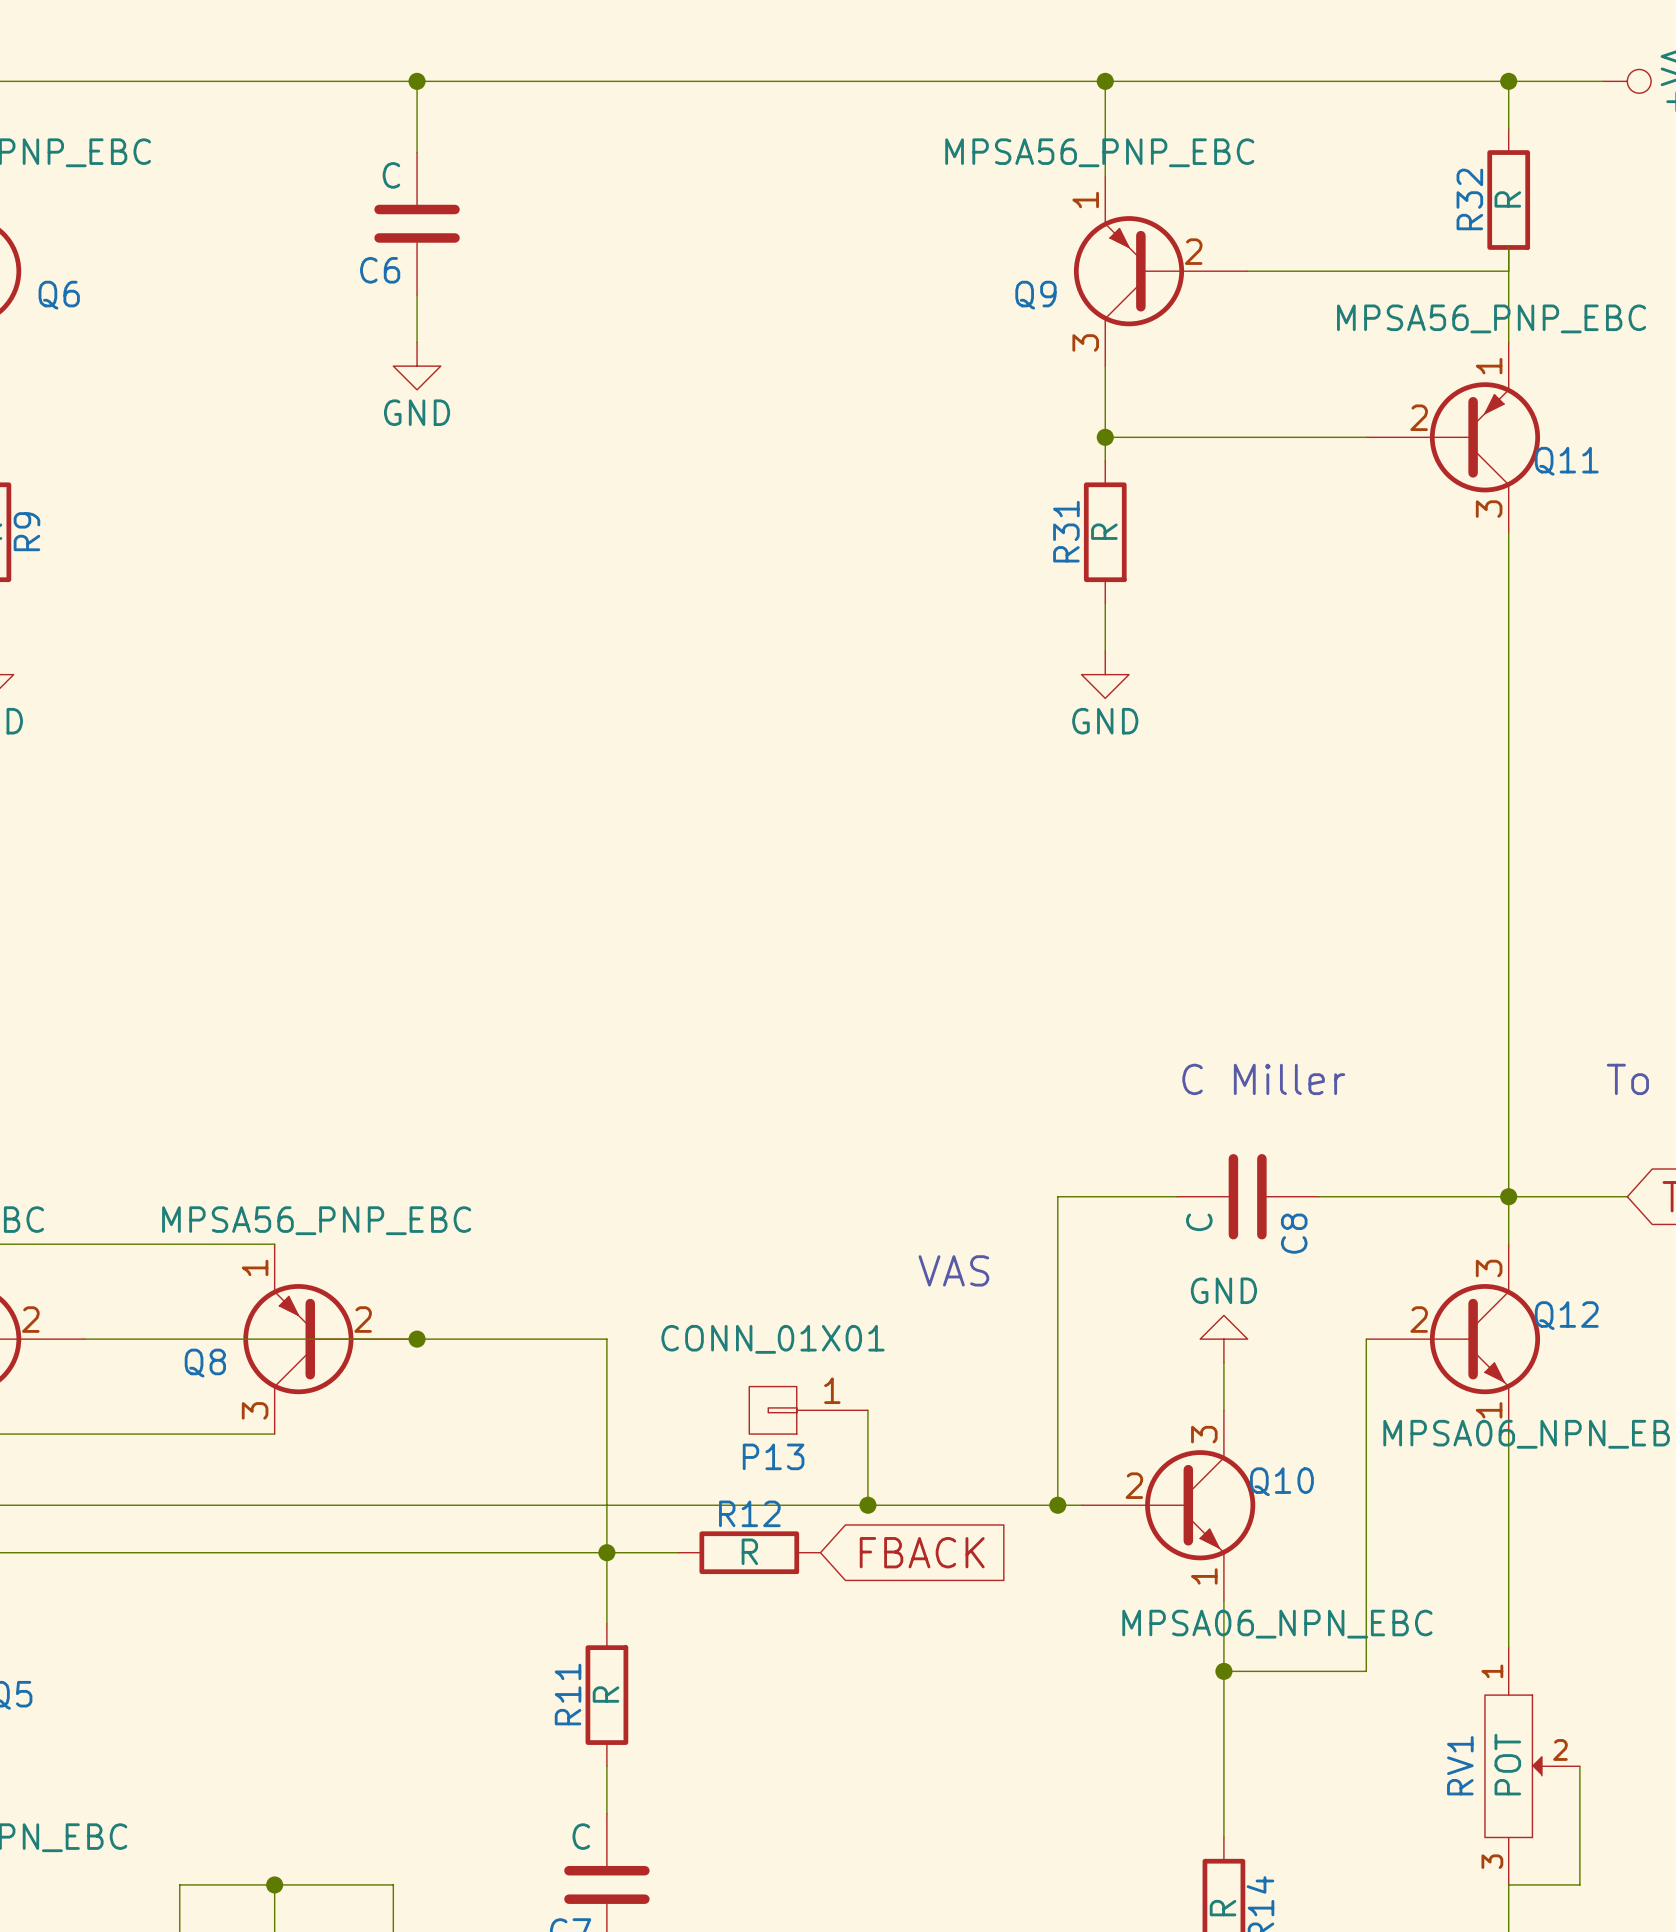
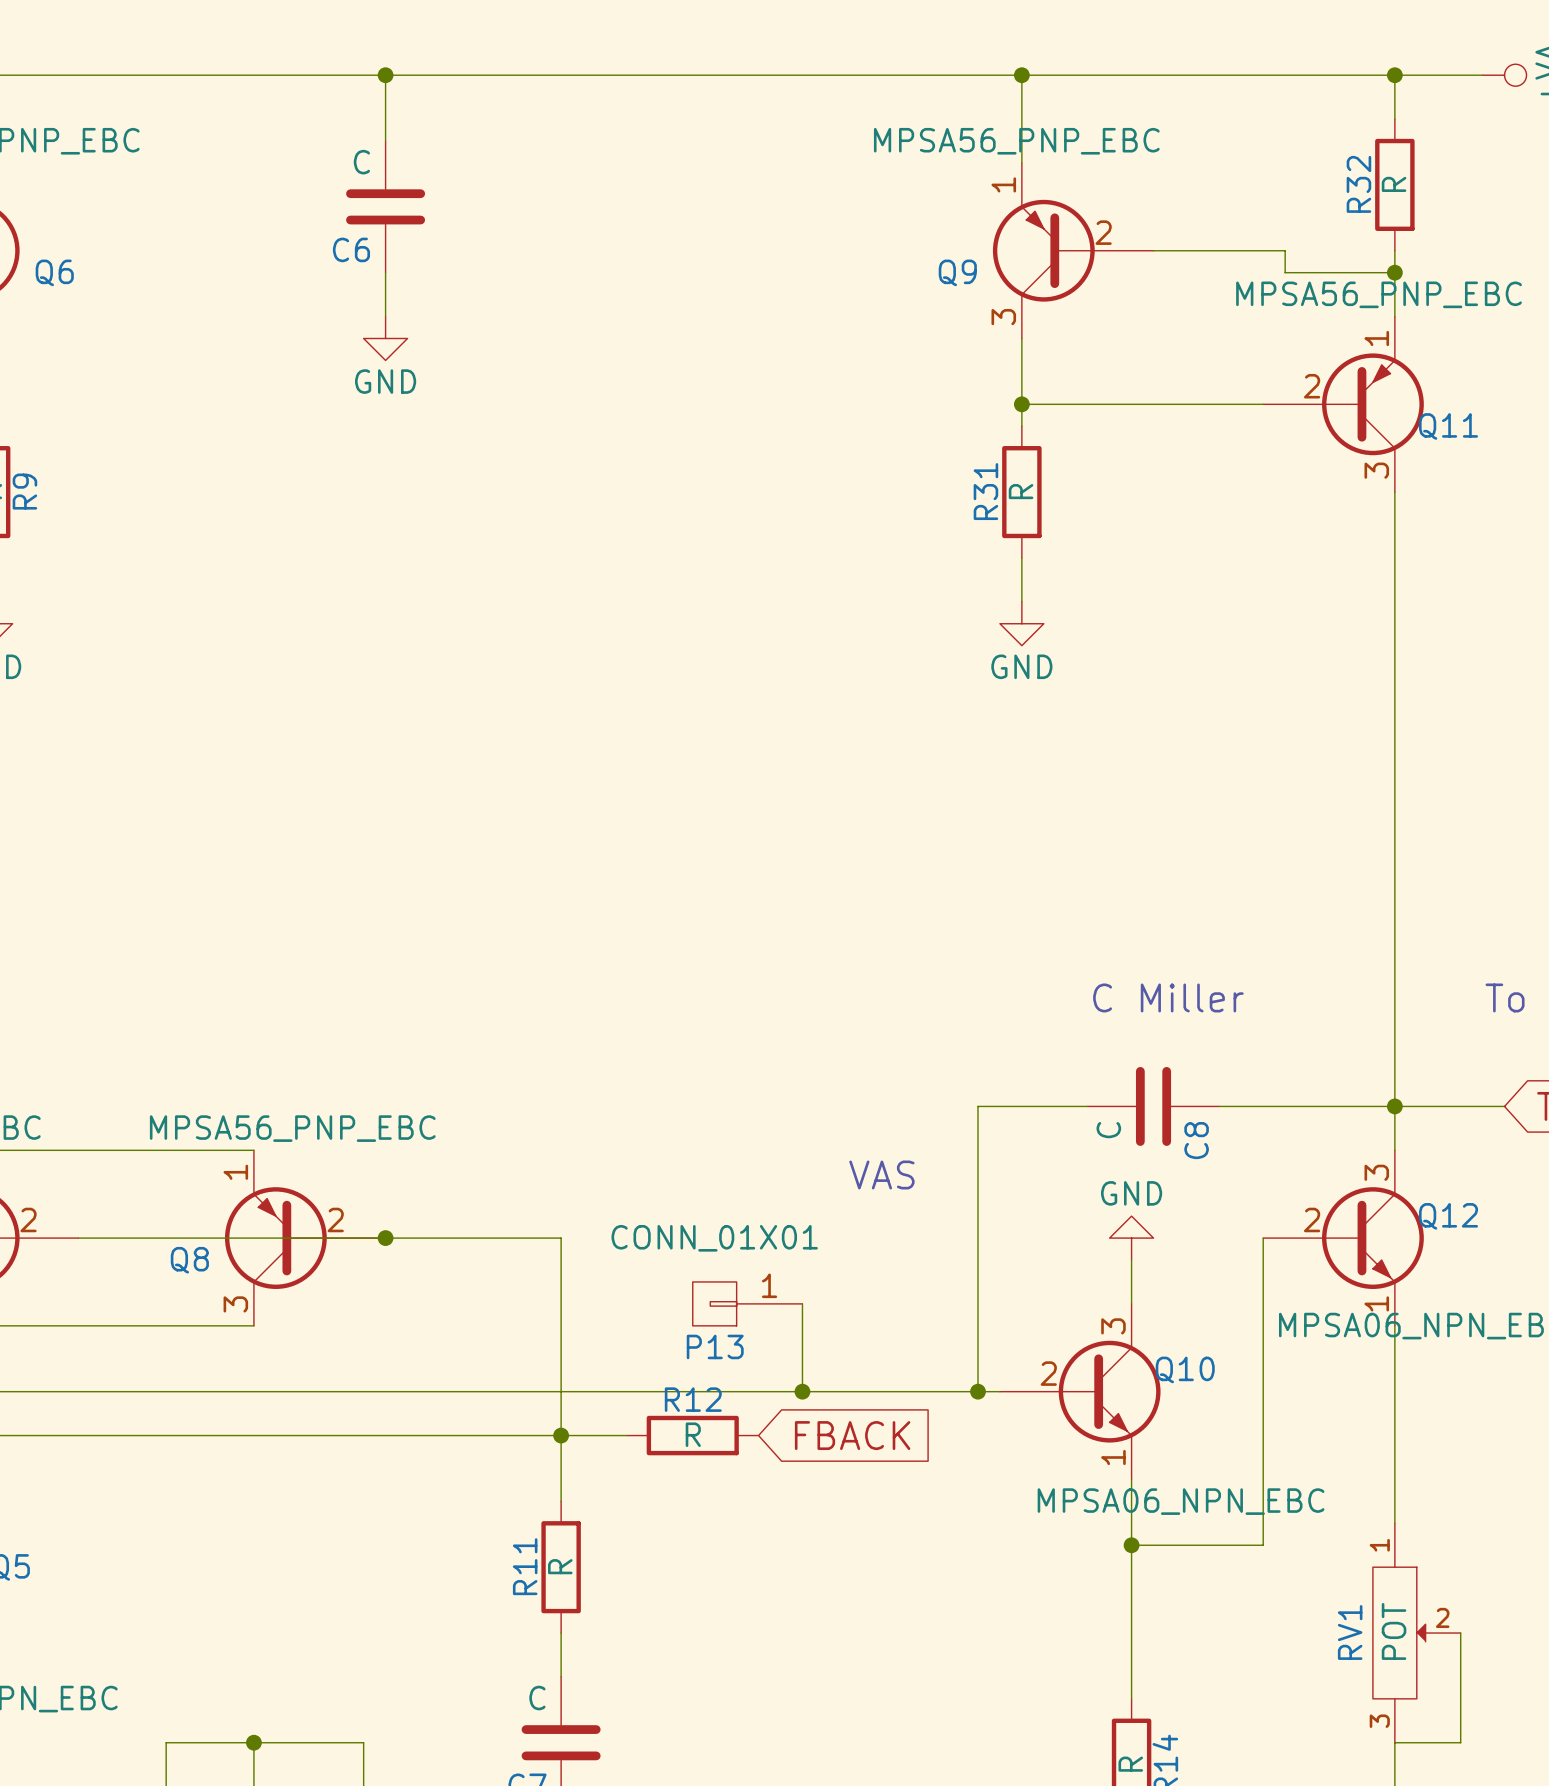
wire: (1508, 247) (1508, 271) (1390, 271) -> (1394, 272) (1285, 272) (1285, 250)
junction: none -> (1394, 272)

